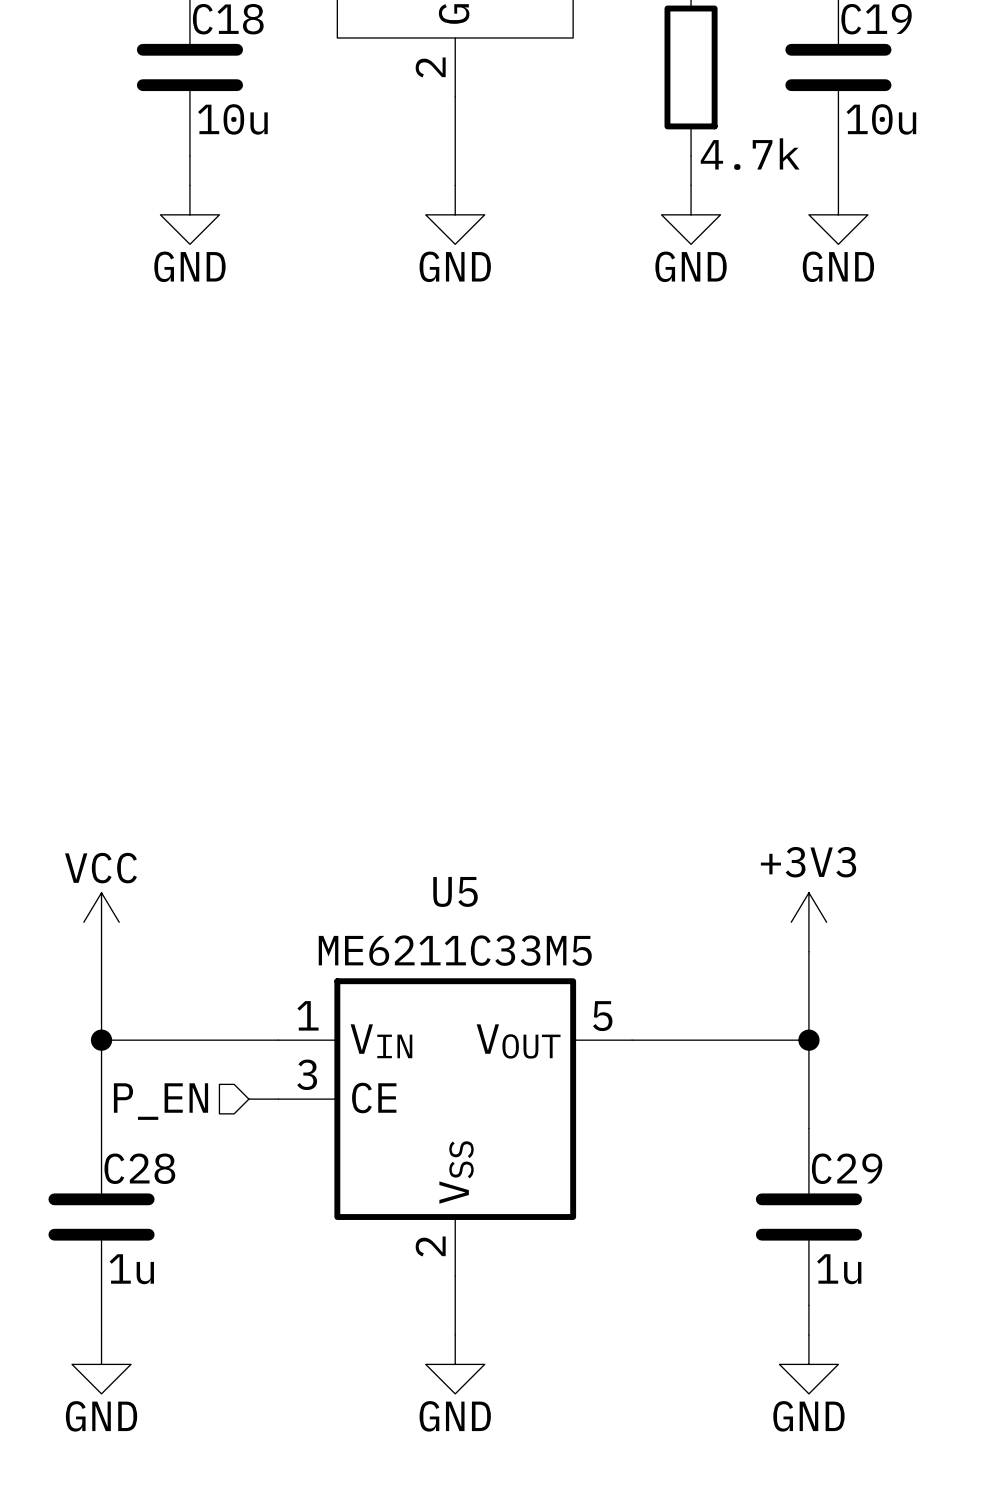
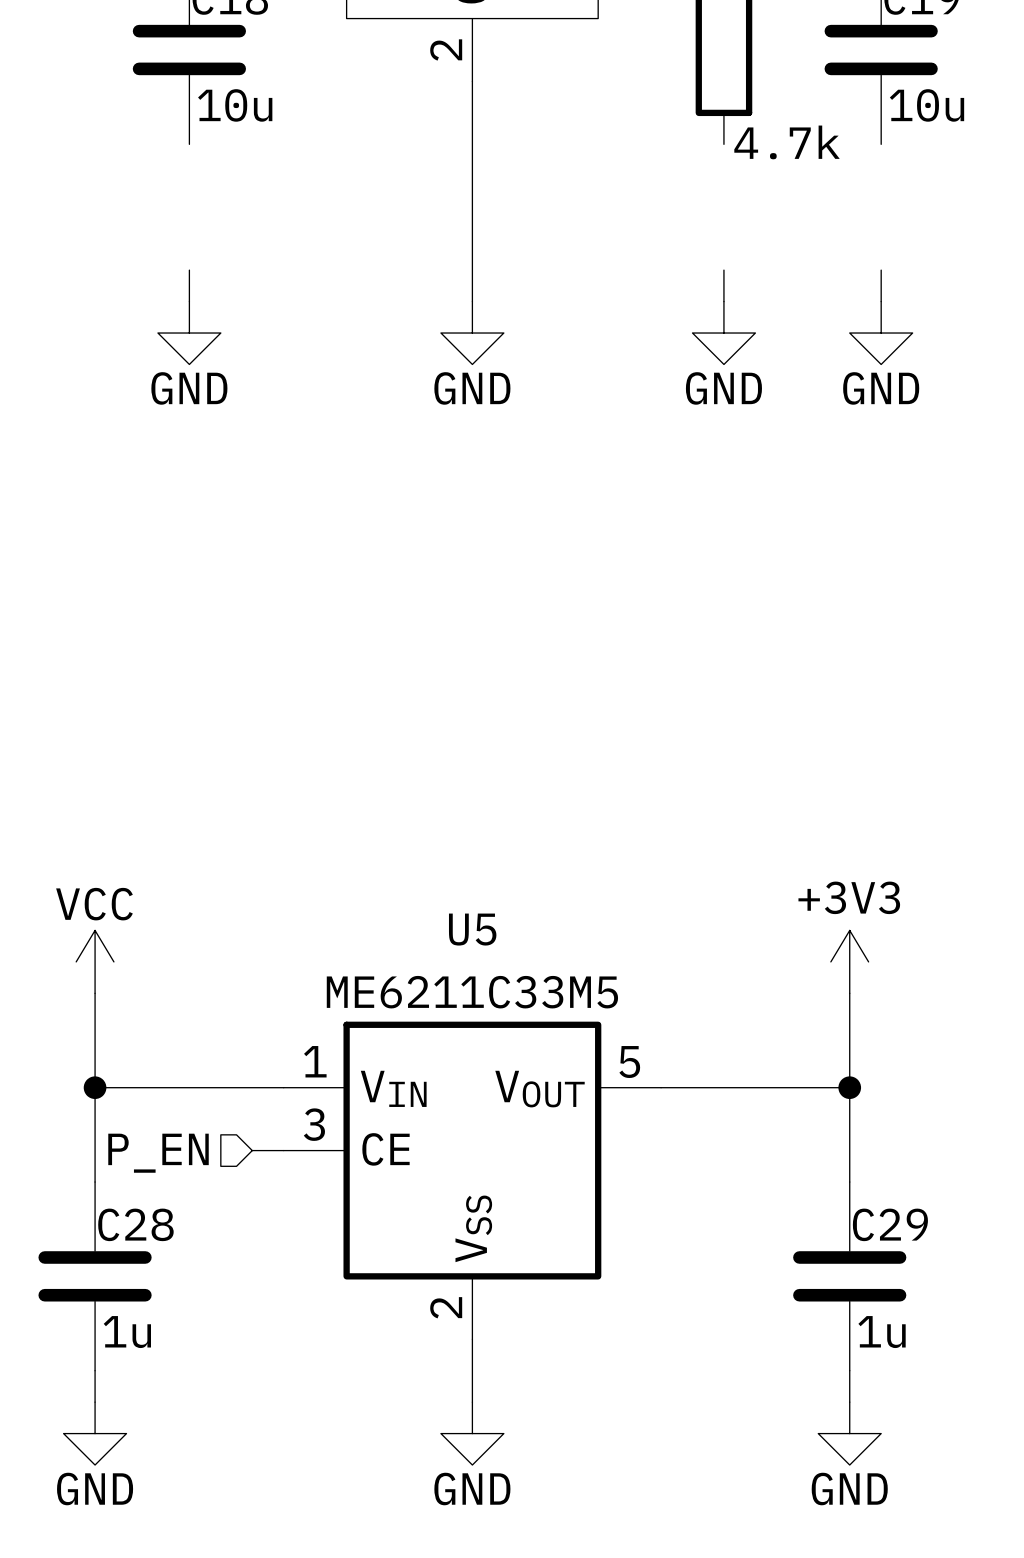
wire: (189, 155) (189, 185) -> (189, 270) (189, 301)
wire: (691, 155) (691, 185) -> (723, 270) (723, 301)
wire: (838, 155) (838, 185) -> (881, 270) (881, 301)
wire: none -> (472, 175) (472, 301)
power symbol position: GND (189, 214) -> GND (189, 333)
power symbol position: GND (455, 214) -> GND (472, 333)
power symbol: GND (691, 214) -> none
power symbol: GND (838, 214) -> none
power symbol: none -> GND (723, 333)
power symbol: none -> GND (881, 333)

